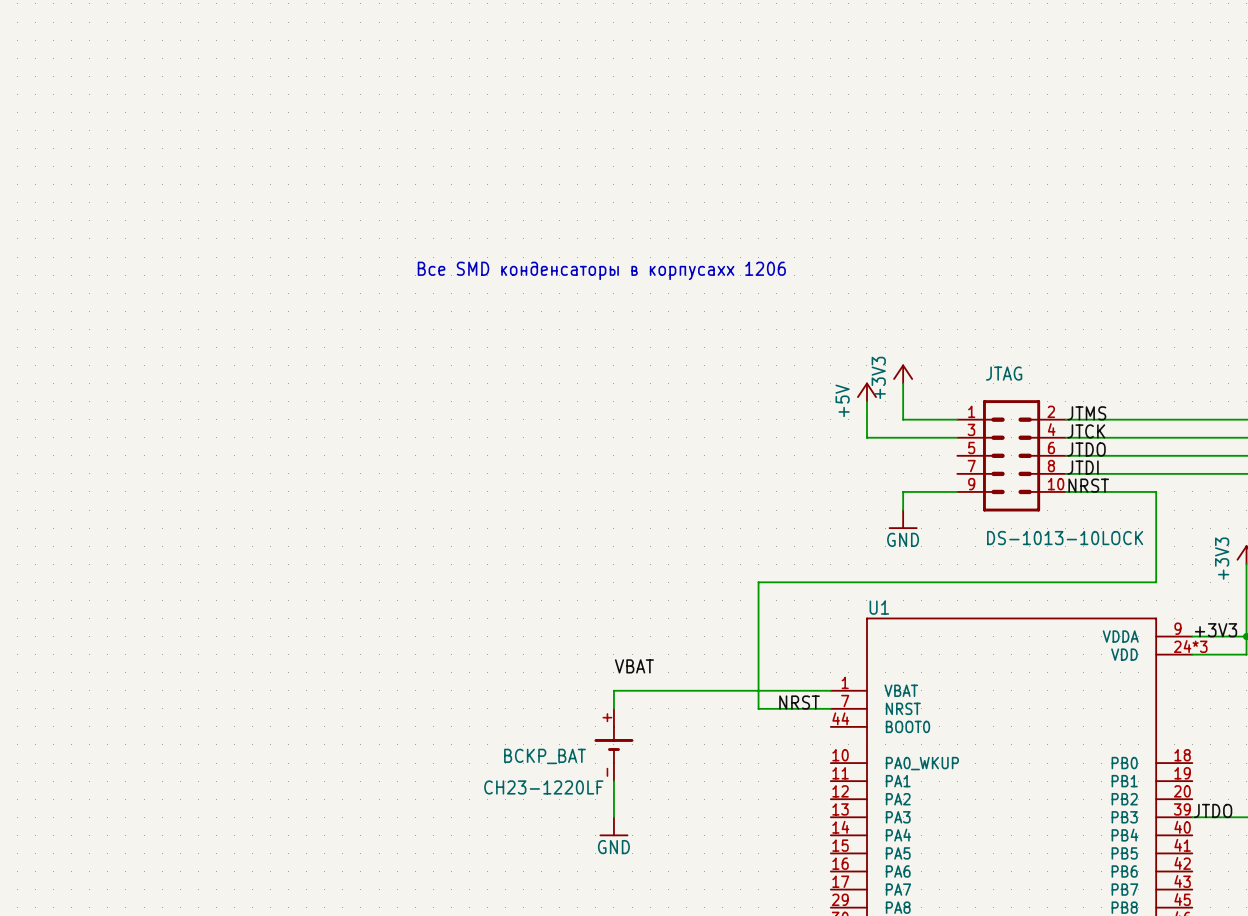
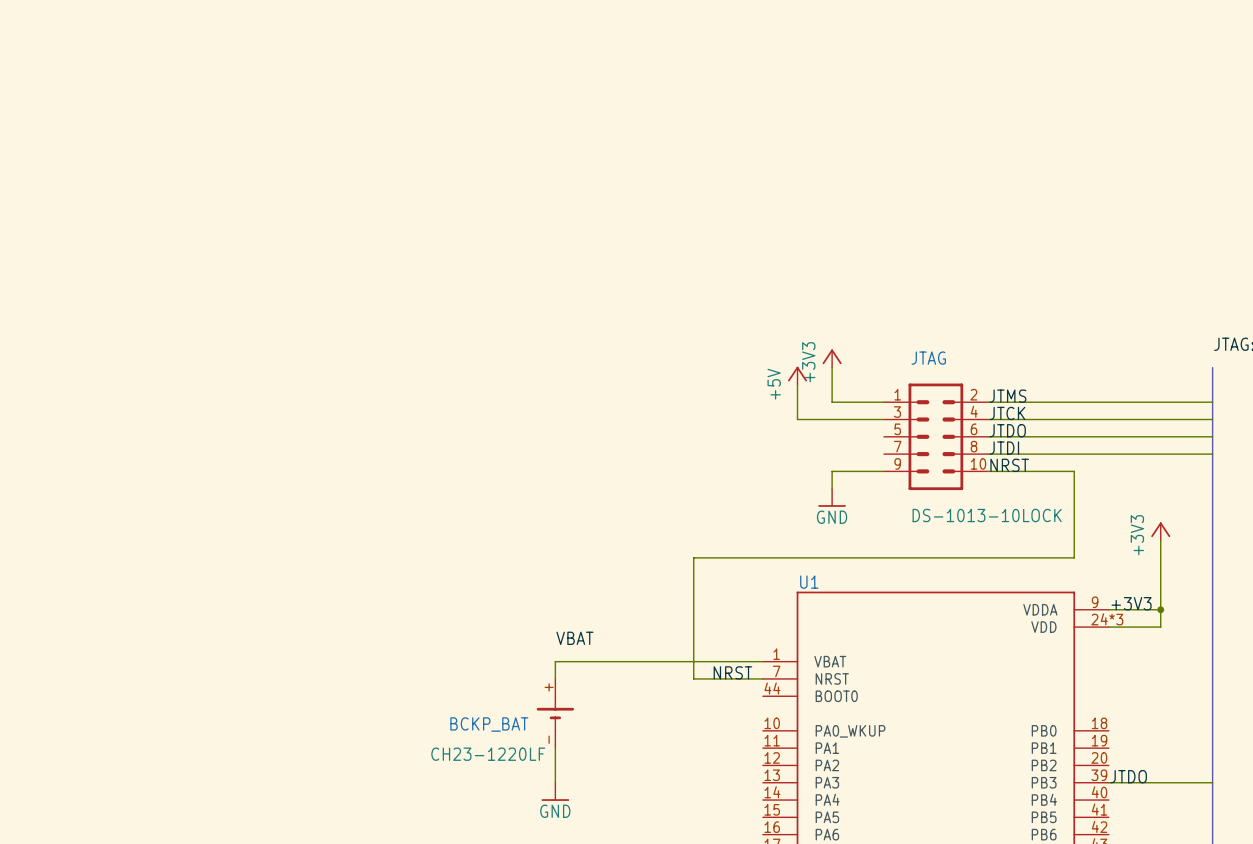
text: Все SMD конденсаторы в корпусахх 1206 (601, 270) -> none

